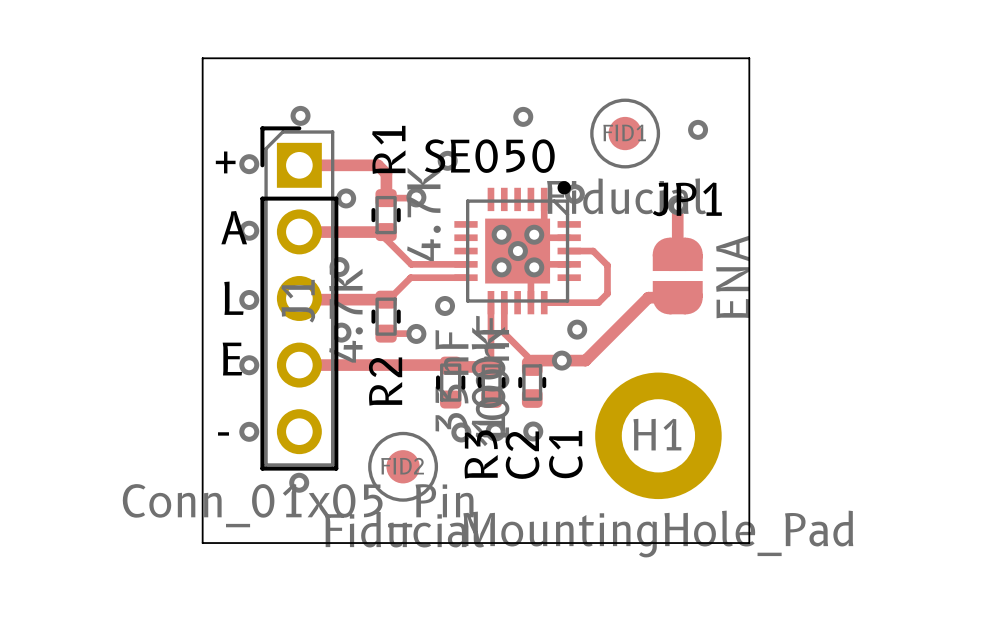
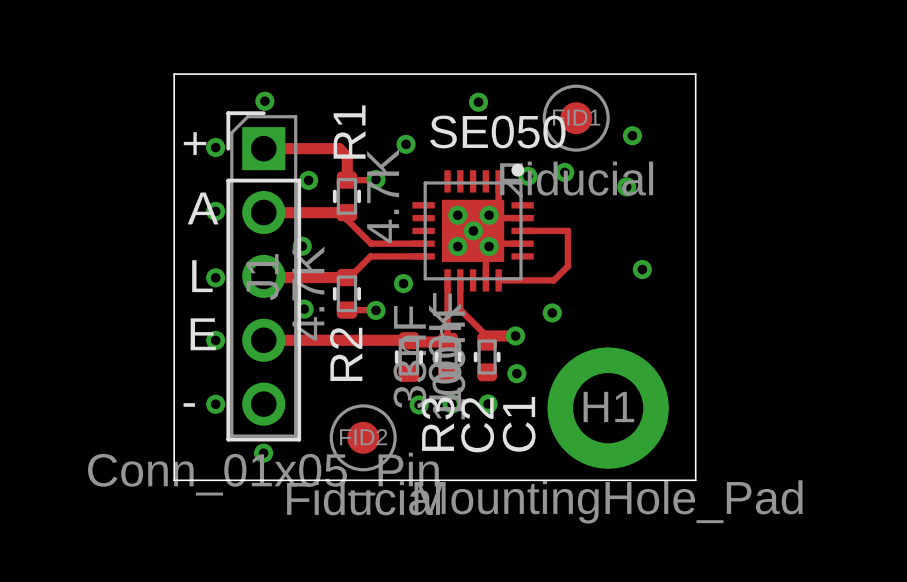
board edge: (202, 58) (749, 58) (749, 543) (202, 543) (202, 58) -> (174, 74) (174, 480) (695, 480) (695, 74) (174, 74)
via position: (698, 129) -> (632, 135)
SE050 name position: SE050 (489, 156) -> SE050 (497, 131)
via: none -> (564, 172)
track: (677, 205) (677, 254) -> none
track: (593, 251) (607, 265) (607, 293) (598, 302) -> (545, 230) (567, 230) (567, 266) (553, 280) (550, 280)
JP1: ENA (677, 276) -> none
via: none -> (642, 269)
track: (677, 297) (648, 297) (585, 360) (561, 360) -> none
via position: (577, 329) -> (552, 312)
via: none -> (516, 373)

